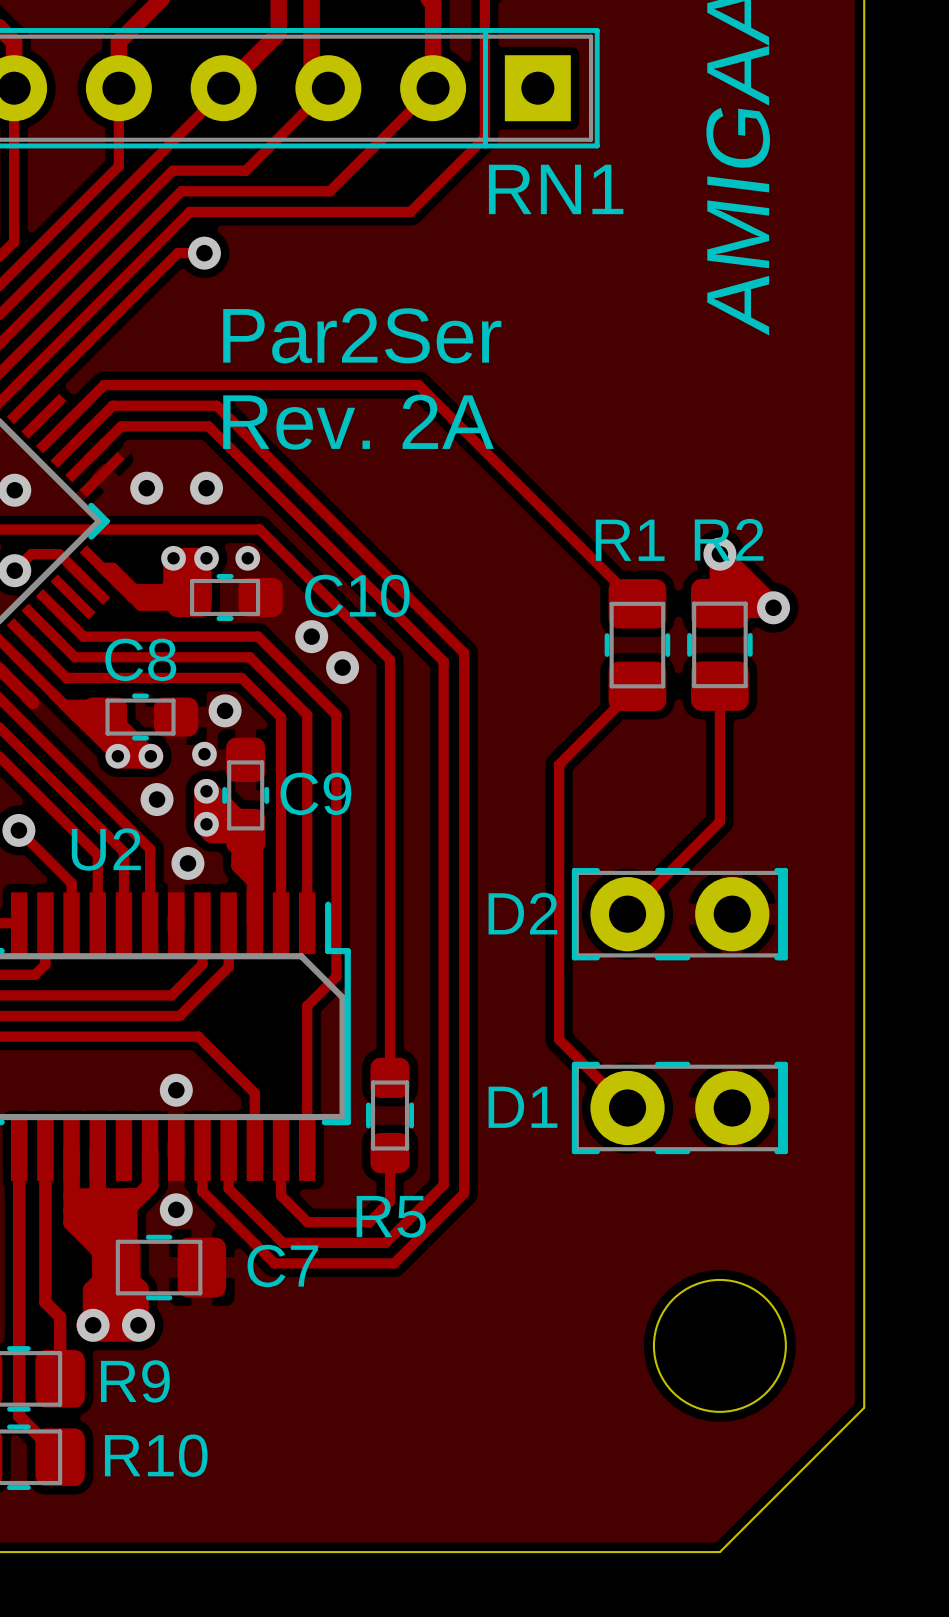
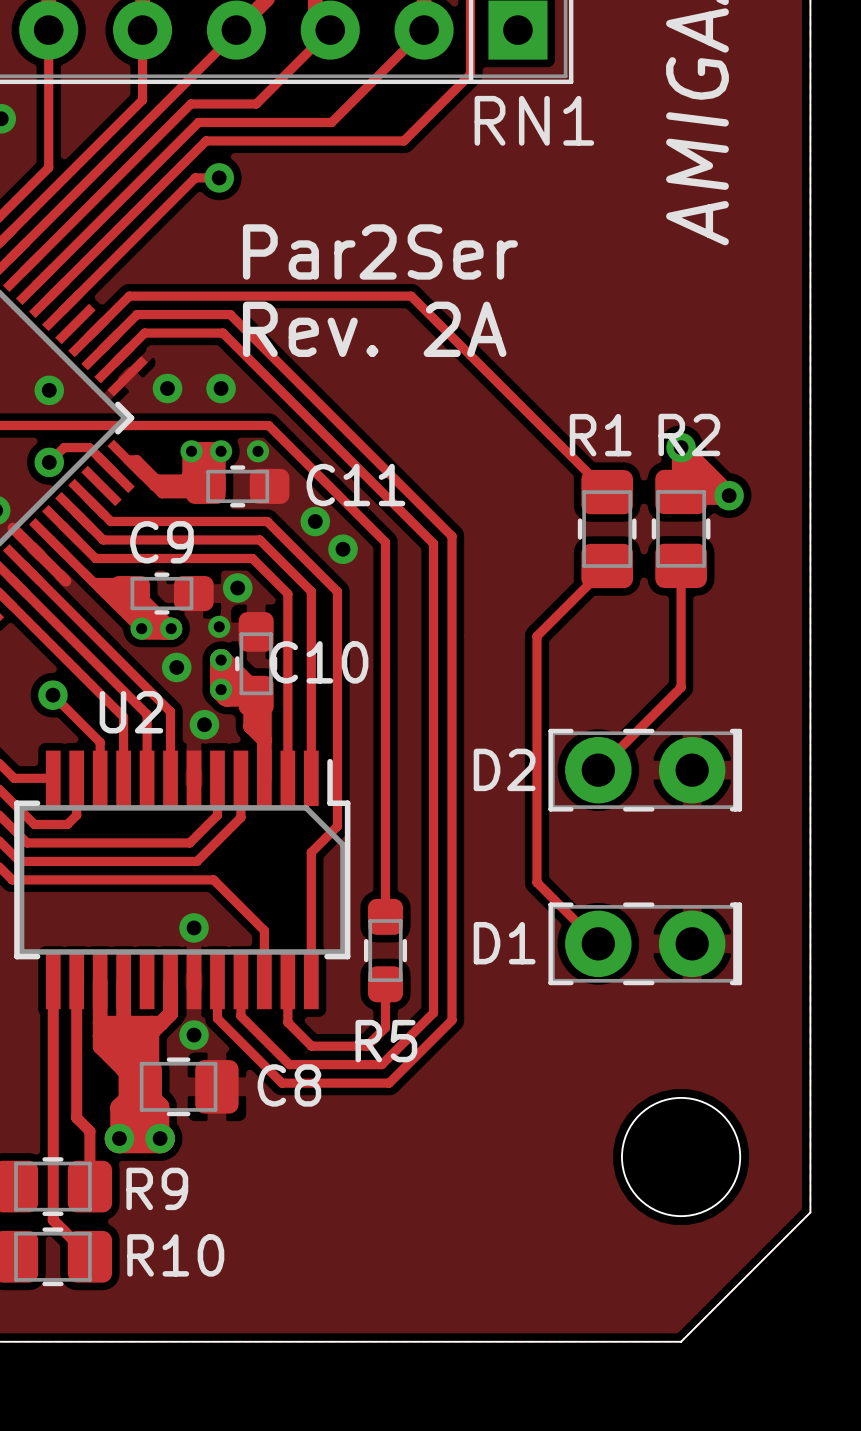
C10 name: C10 (357, 595) -> C11 (355, 485)
C8 name: C8 (140, 659) -> C9 (161, 542)
C9 name: C9 (315, 793) -> C10 (318, 662)
C7 name: C7 (282, 1265) -> C8 (289, 1085)

